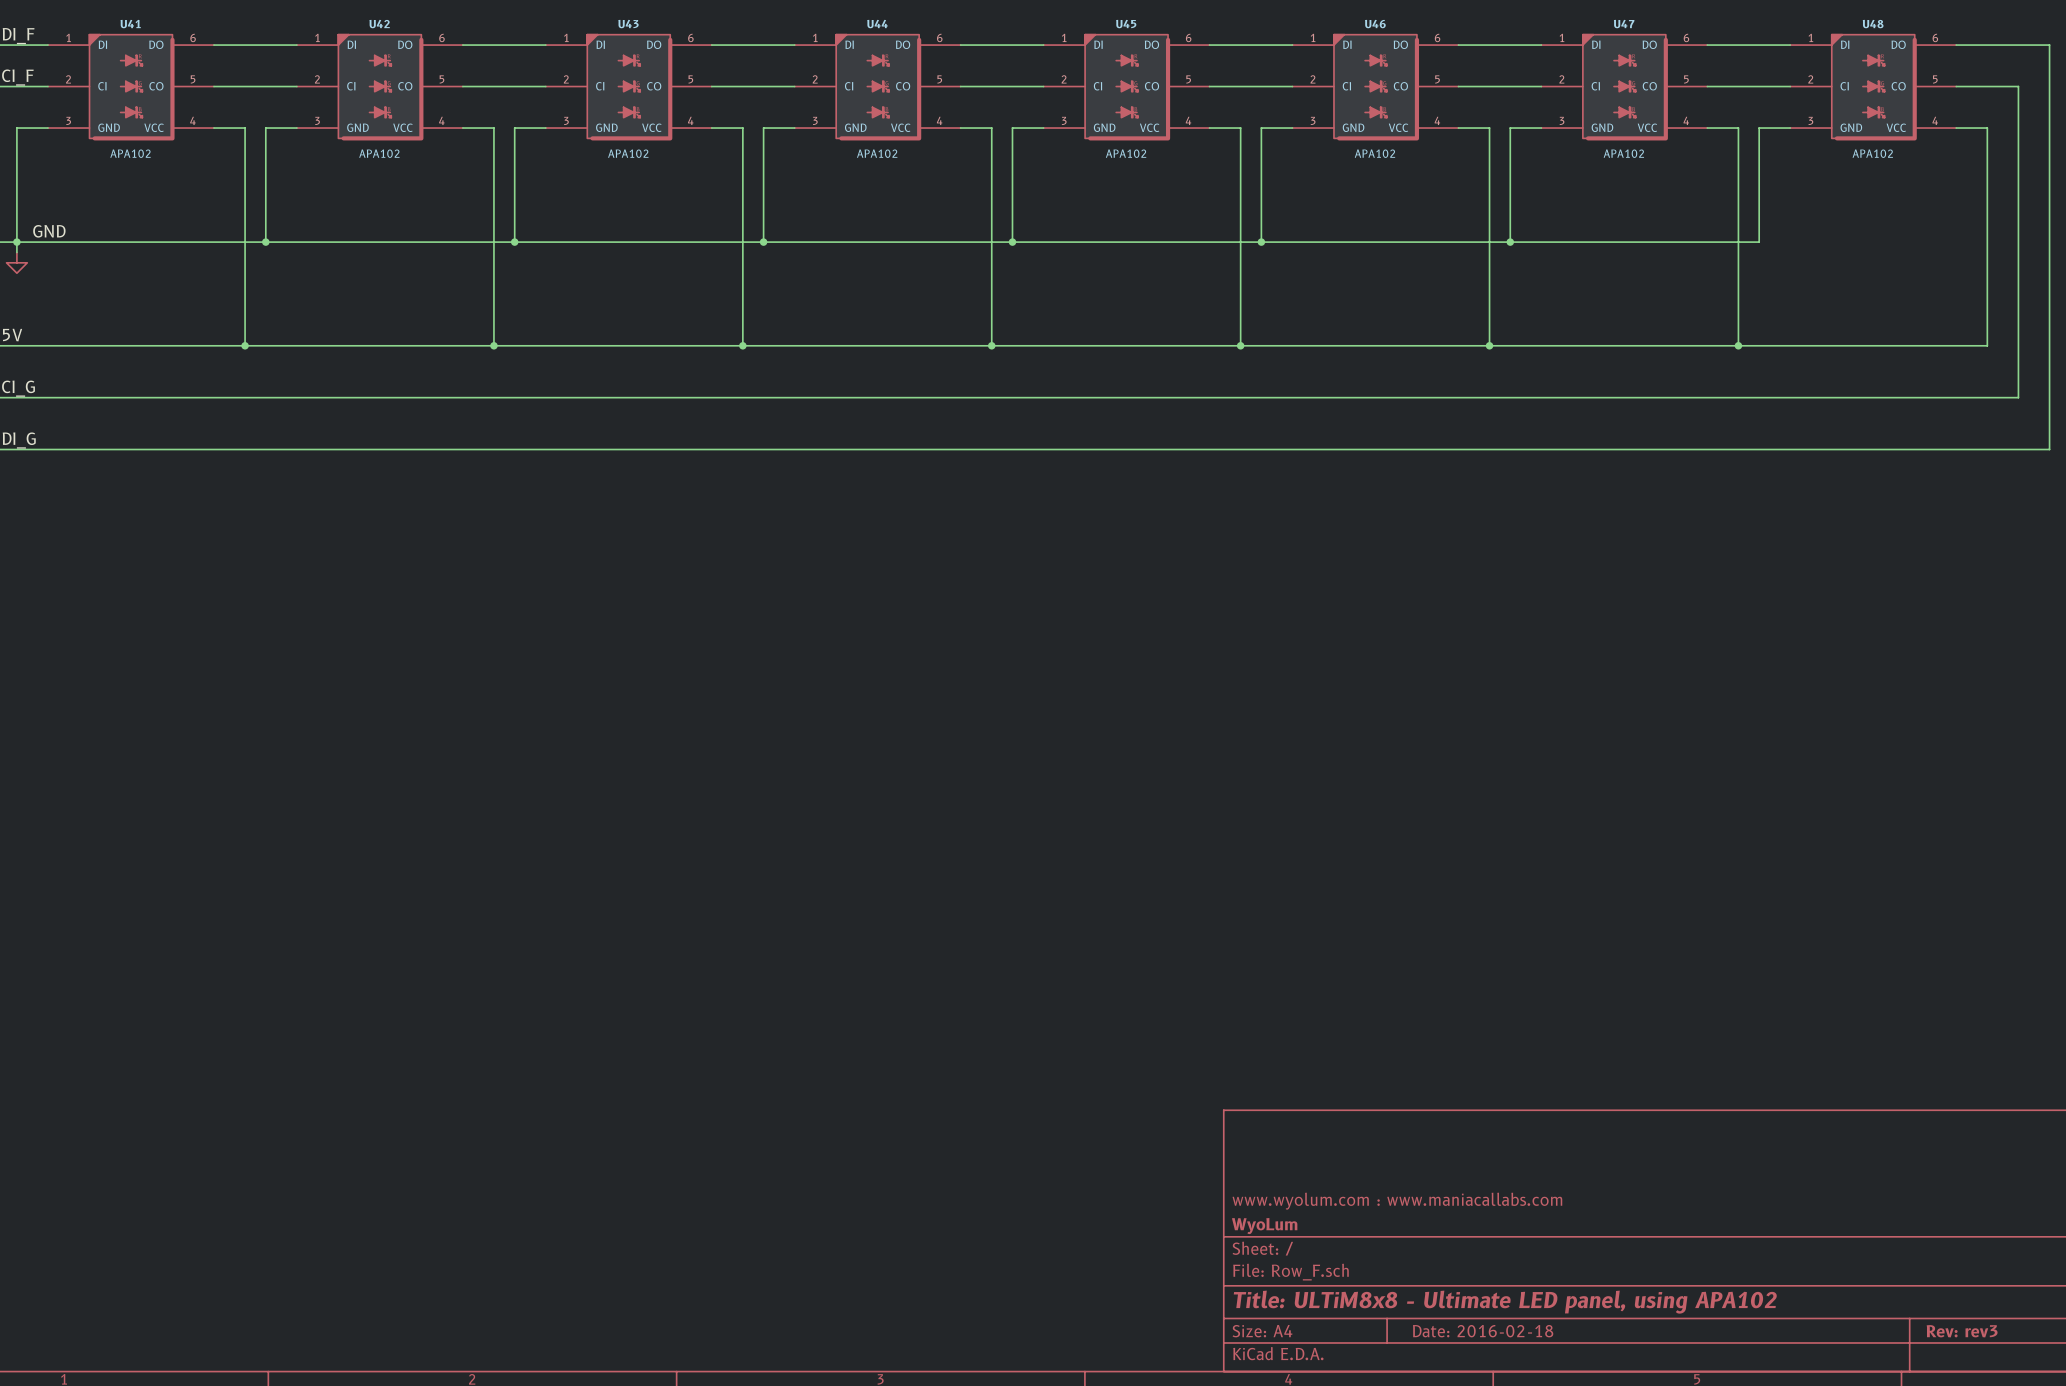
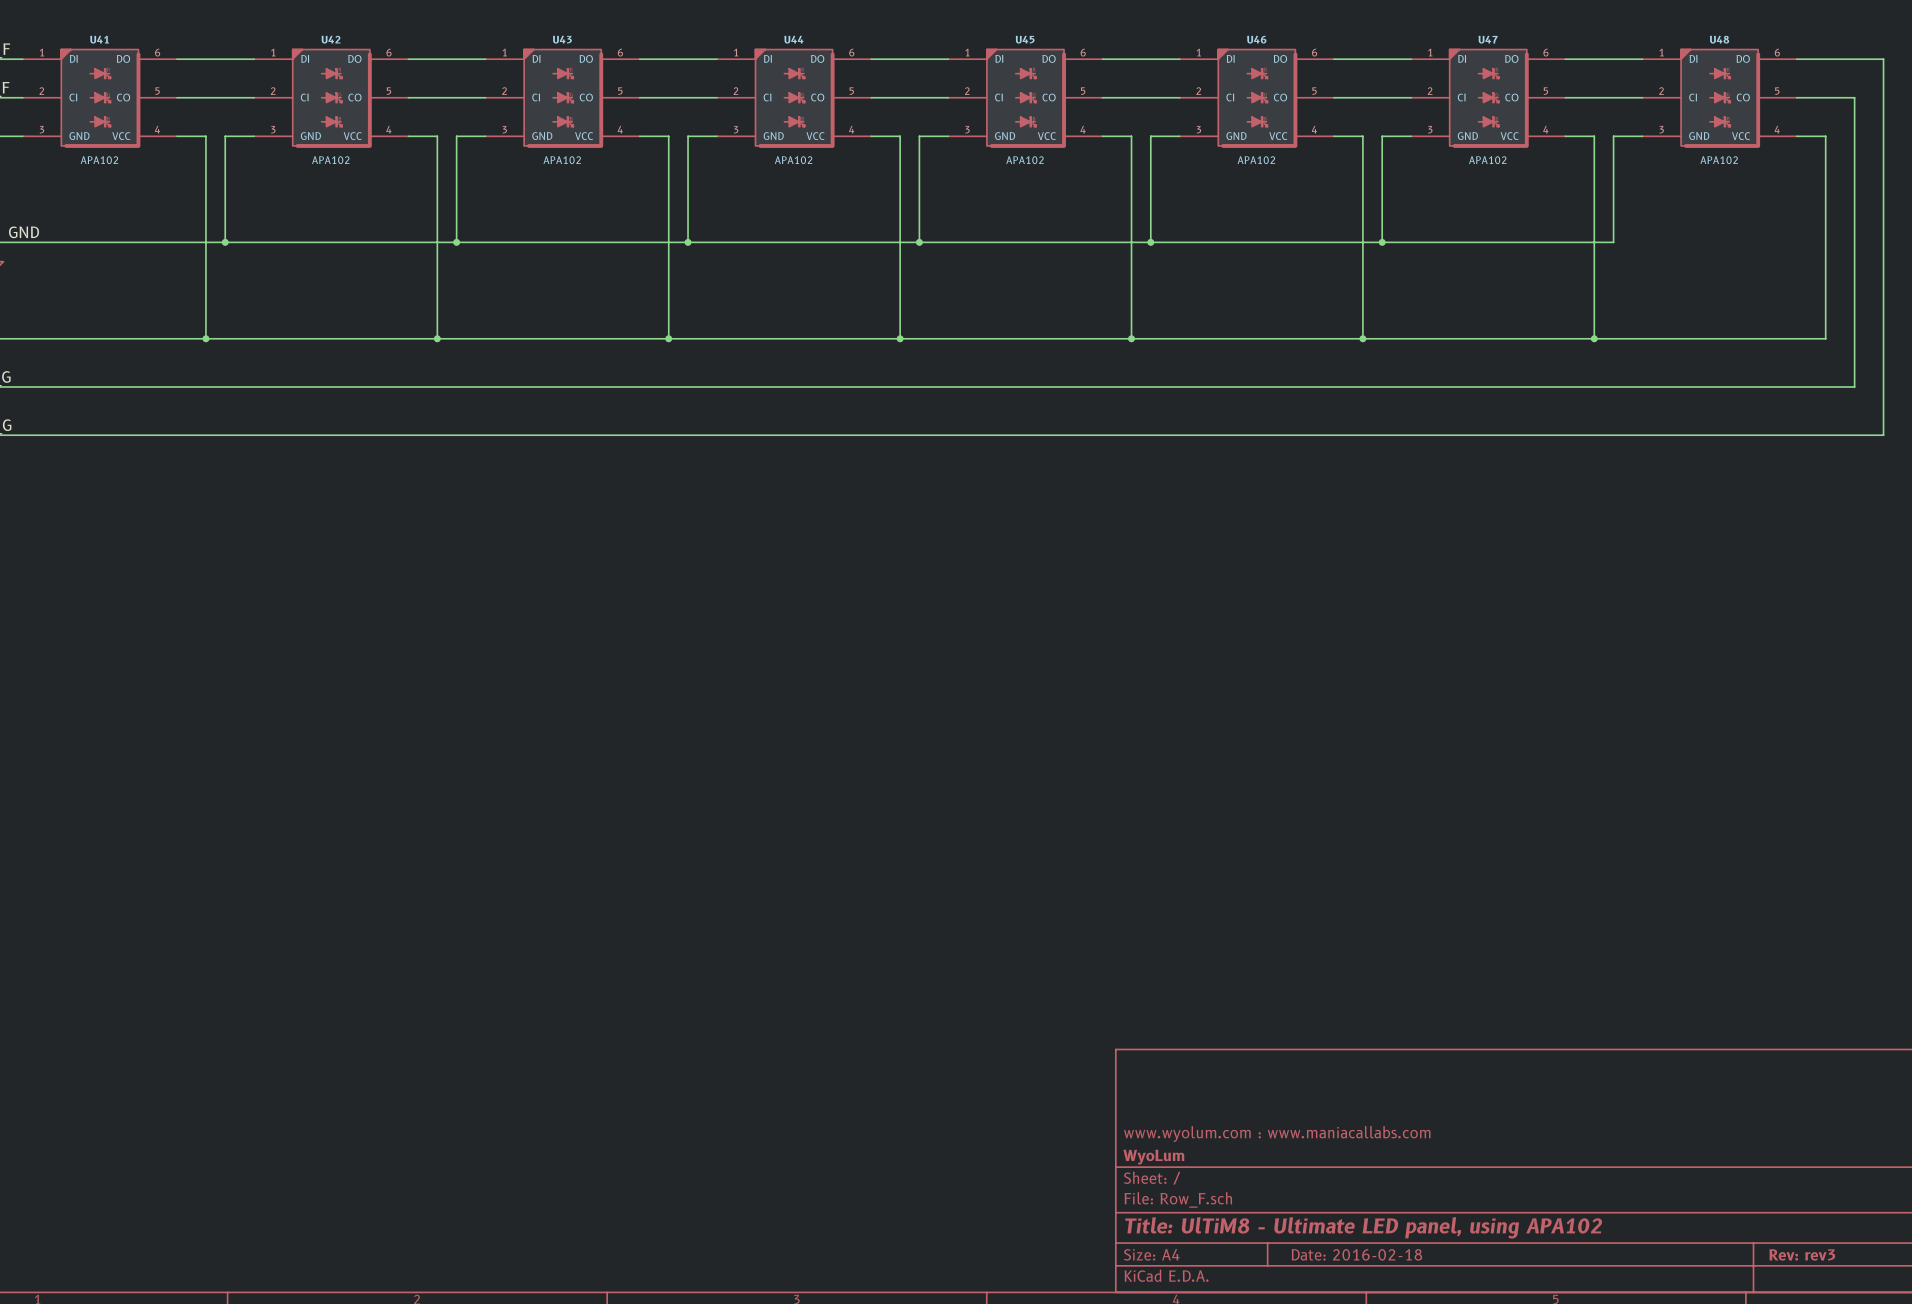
title block: Title: ULTiM8x8 - Ultimate LED panel, using APA102 (1505, 1302) -> Title: UlTiM8 - Ultimate LED panel, using APA102 (1363, 1227)

